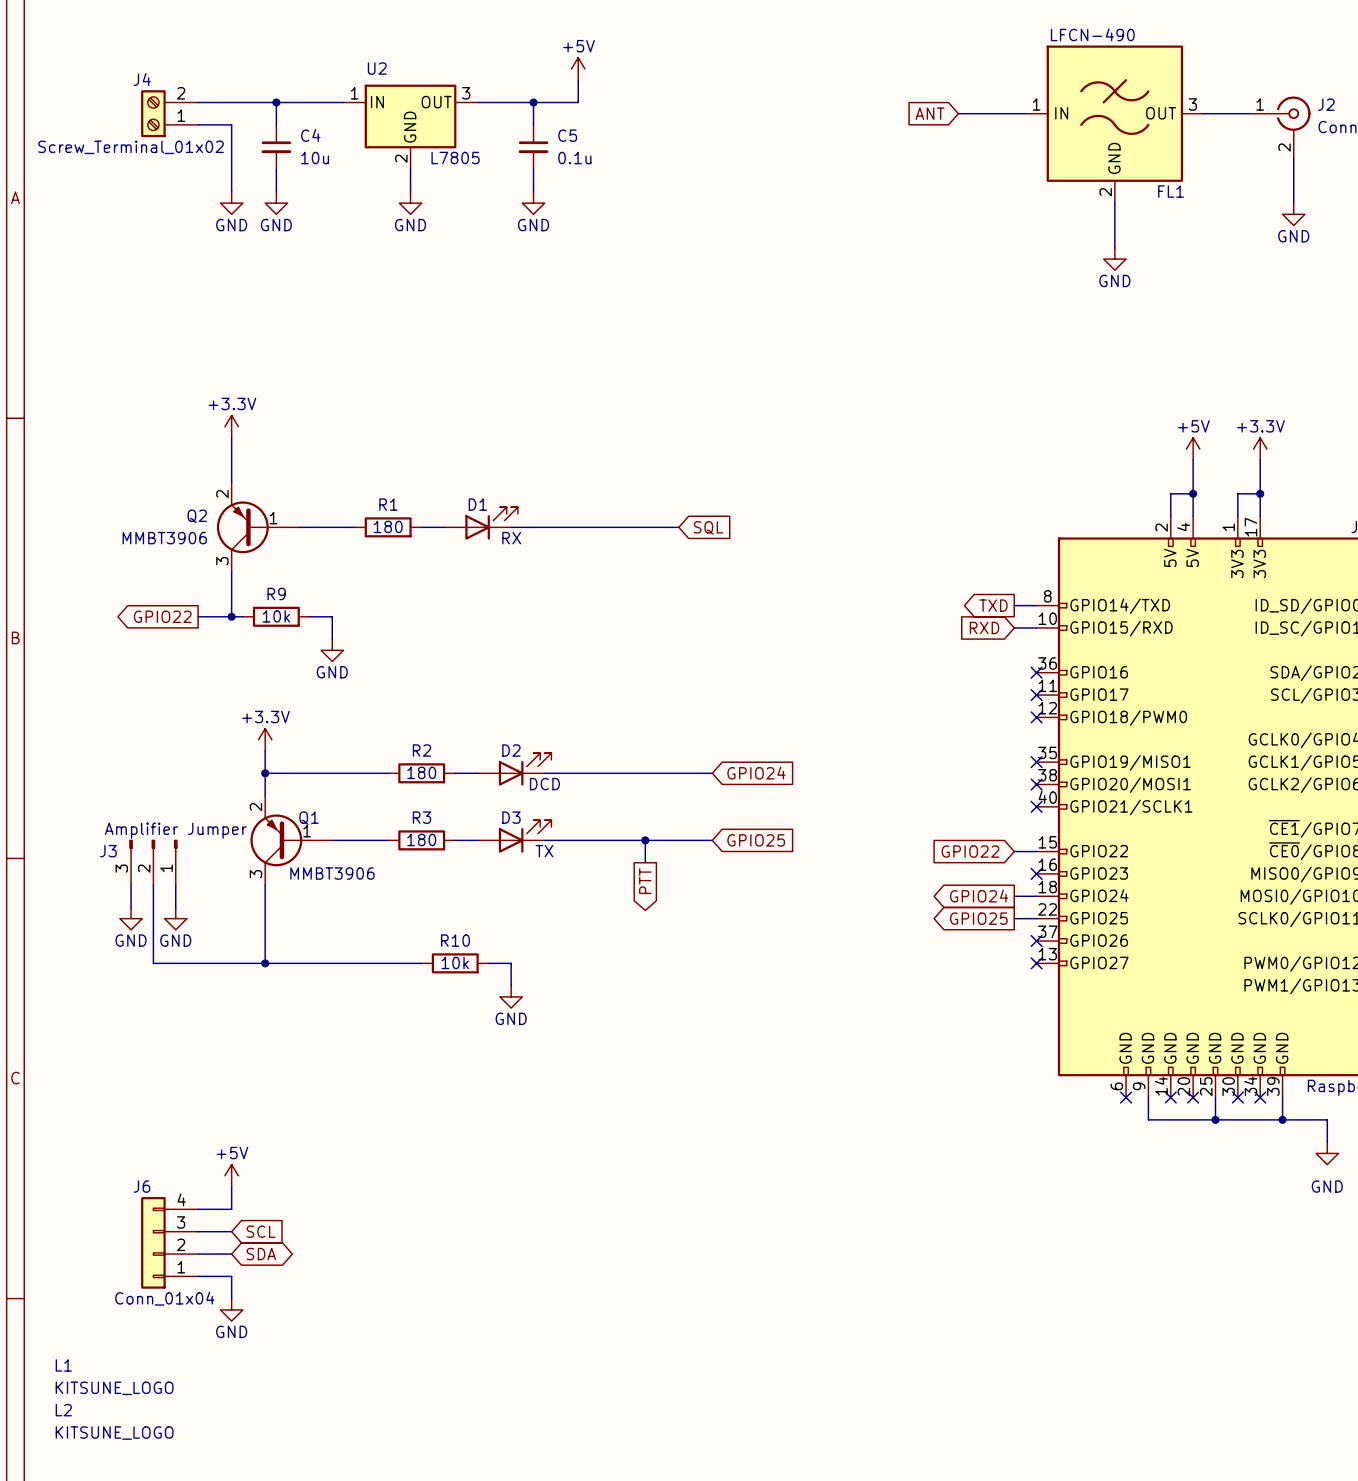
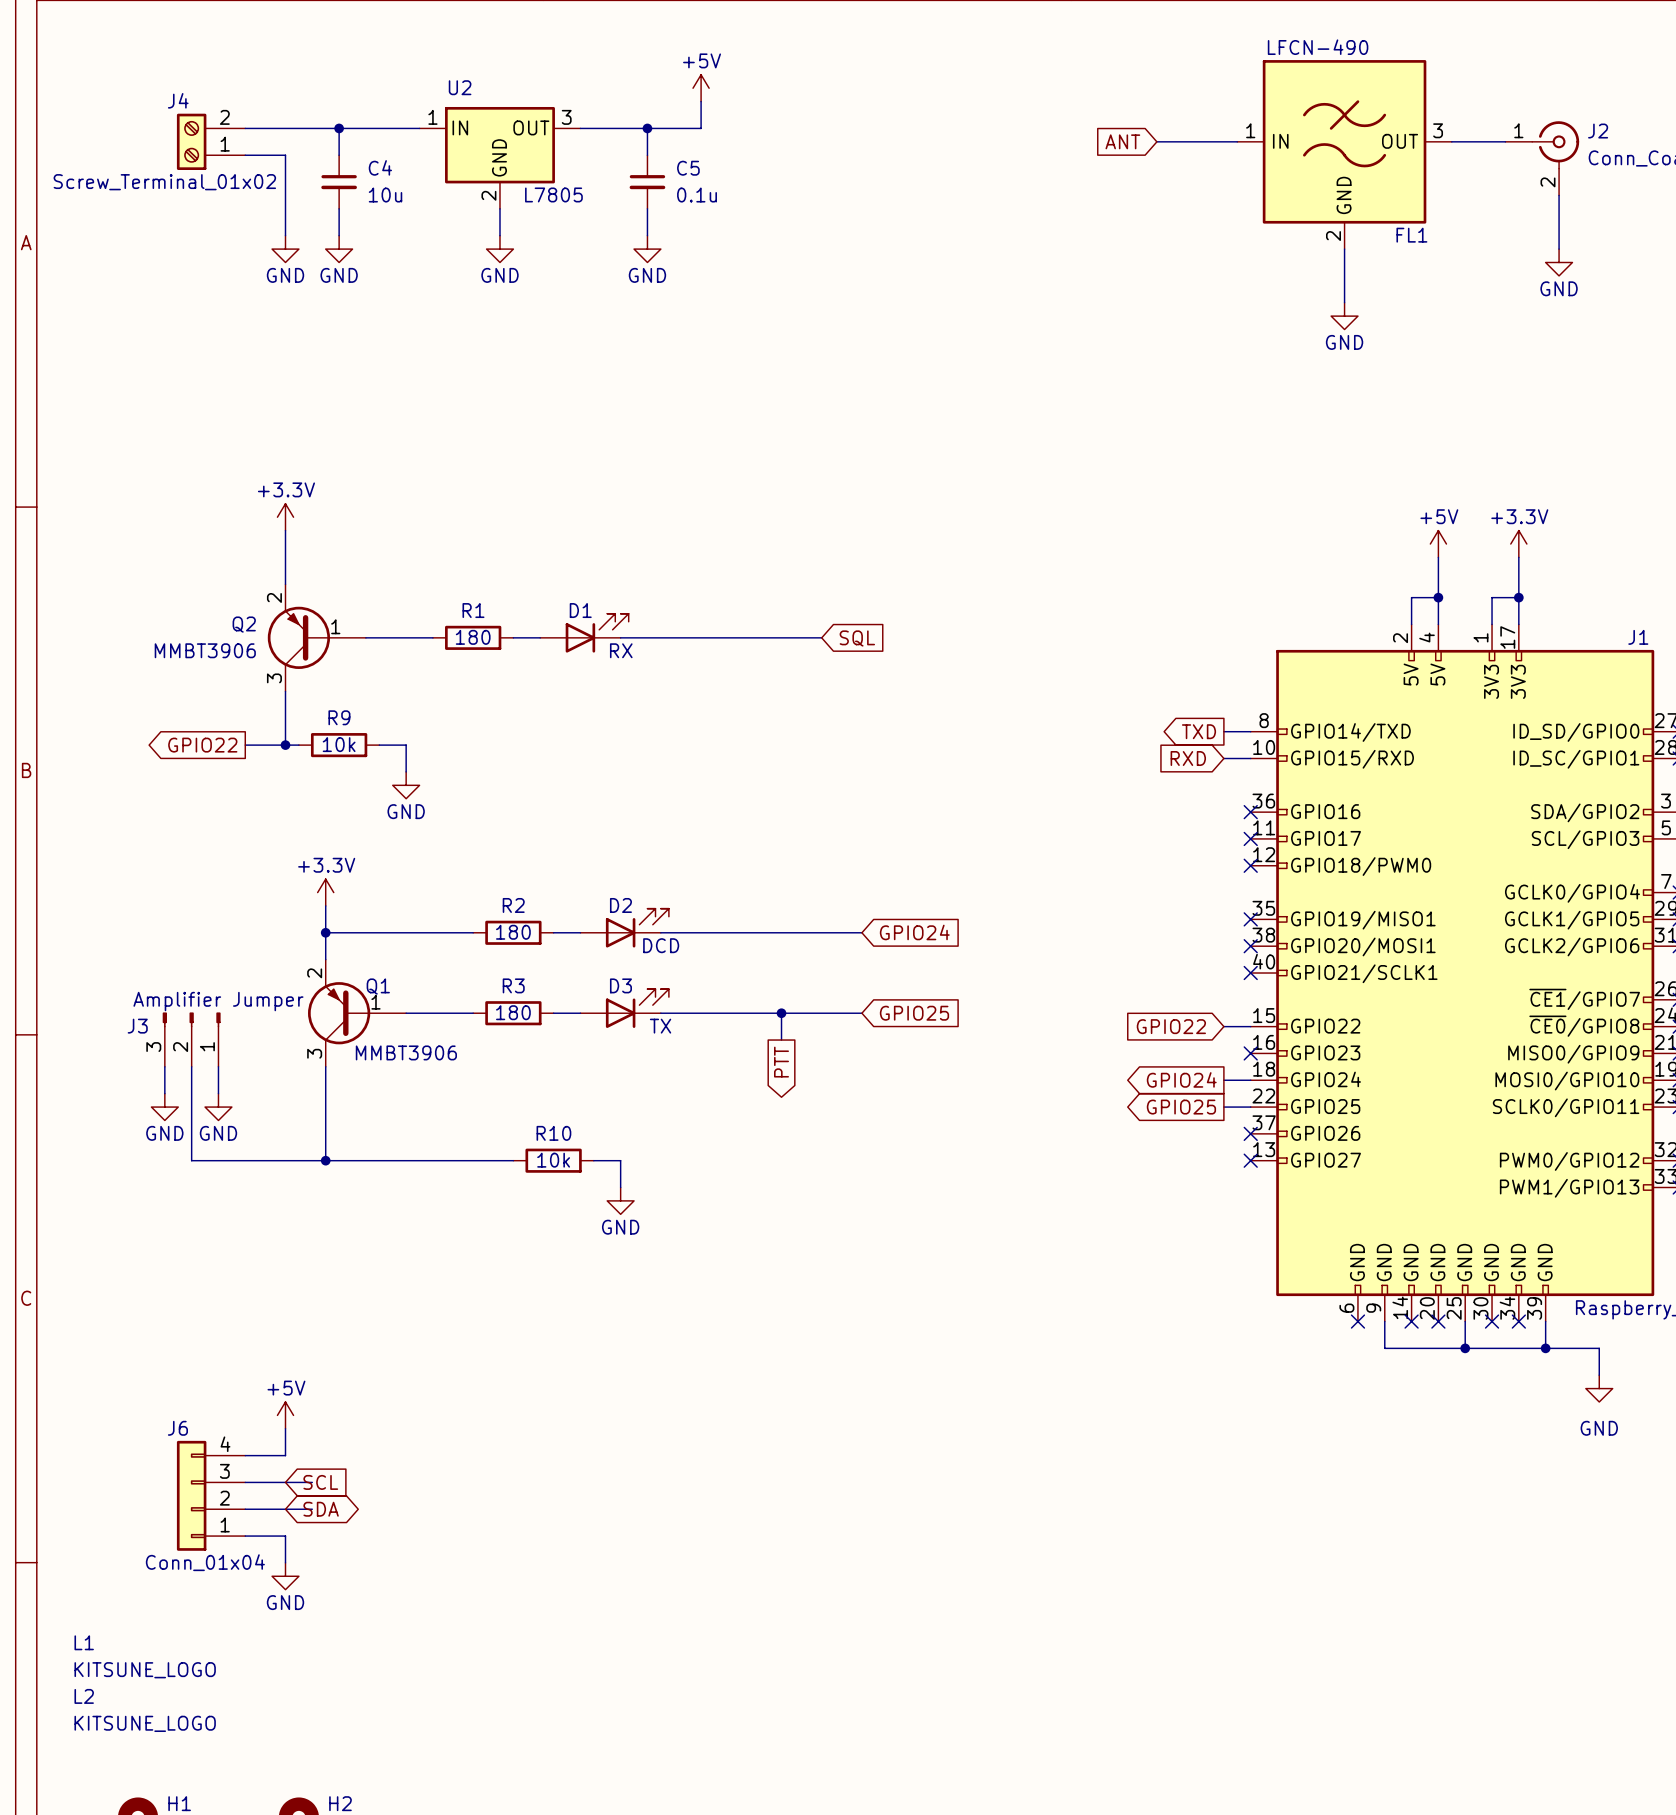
wire: none -> (285, 1482) (312, 1482)
wire: none -> (285, 1509) (312, 1509)

